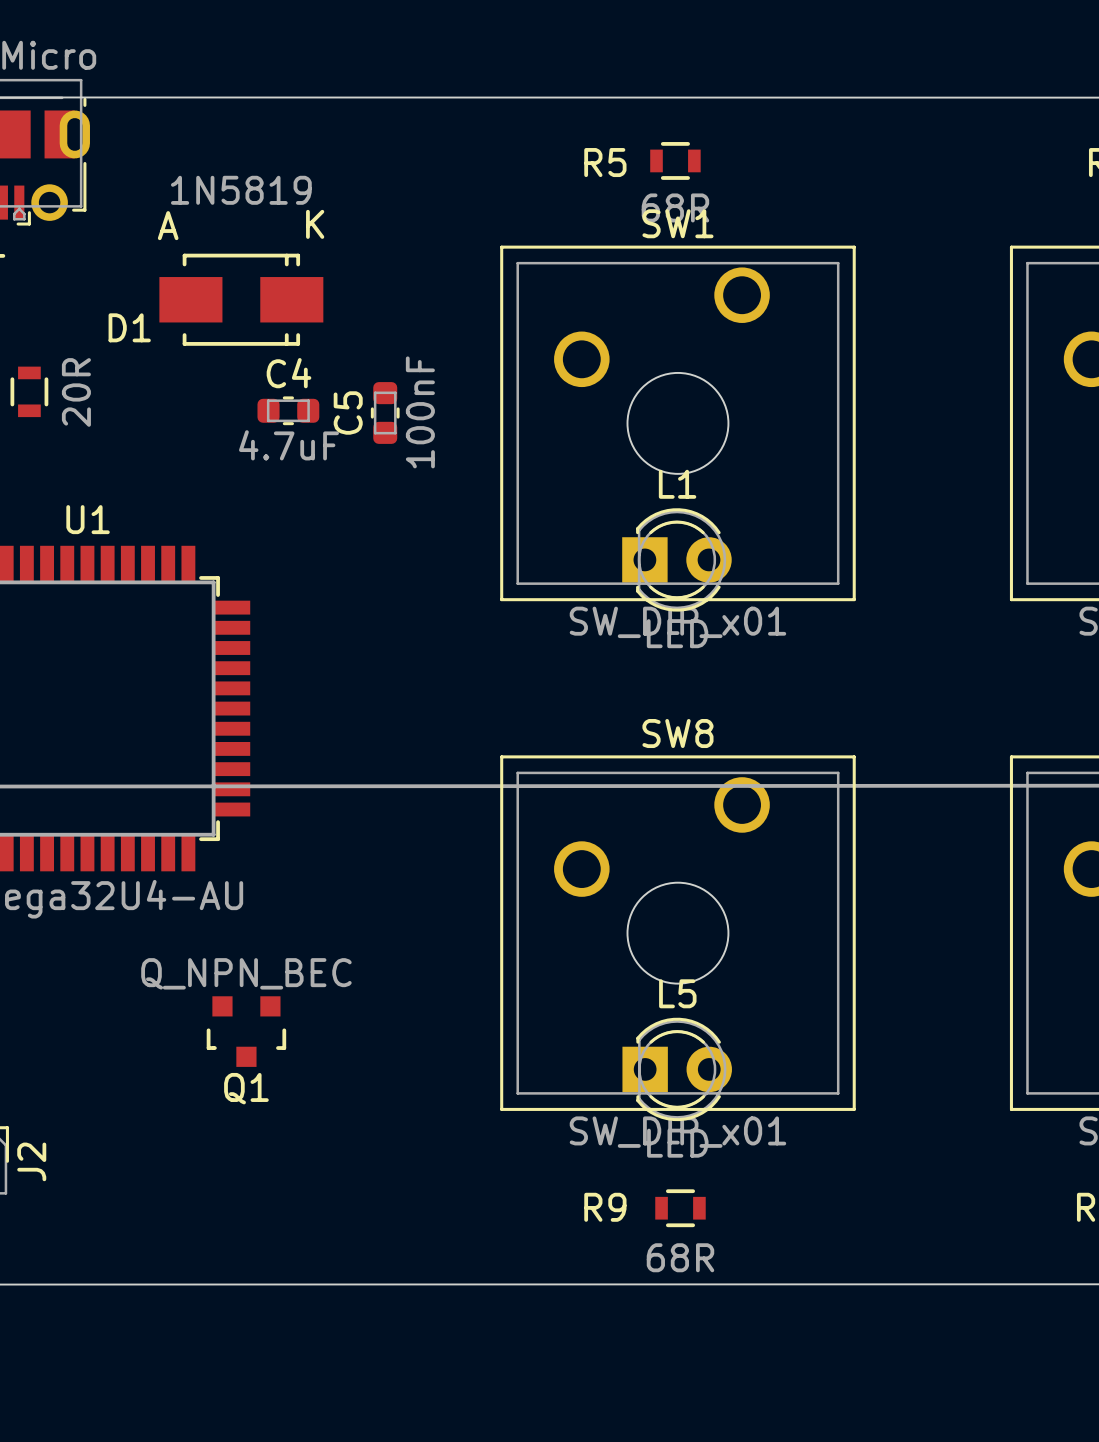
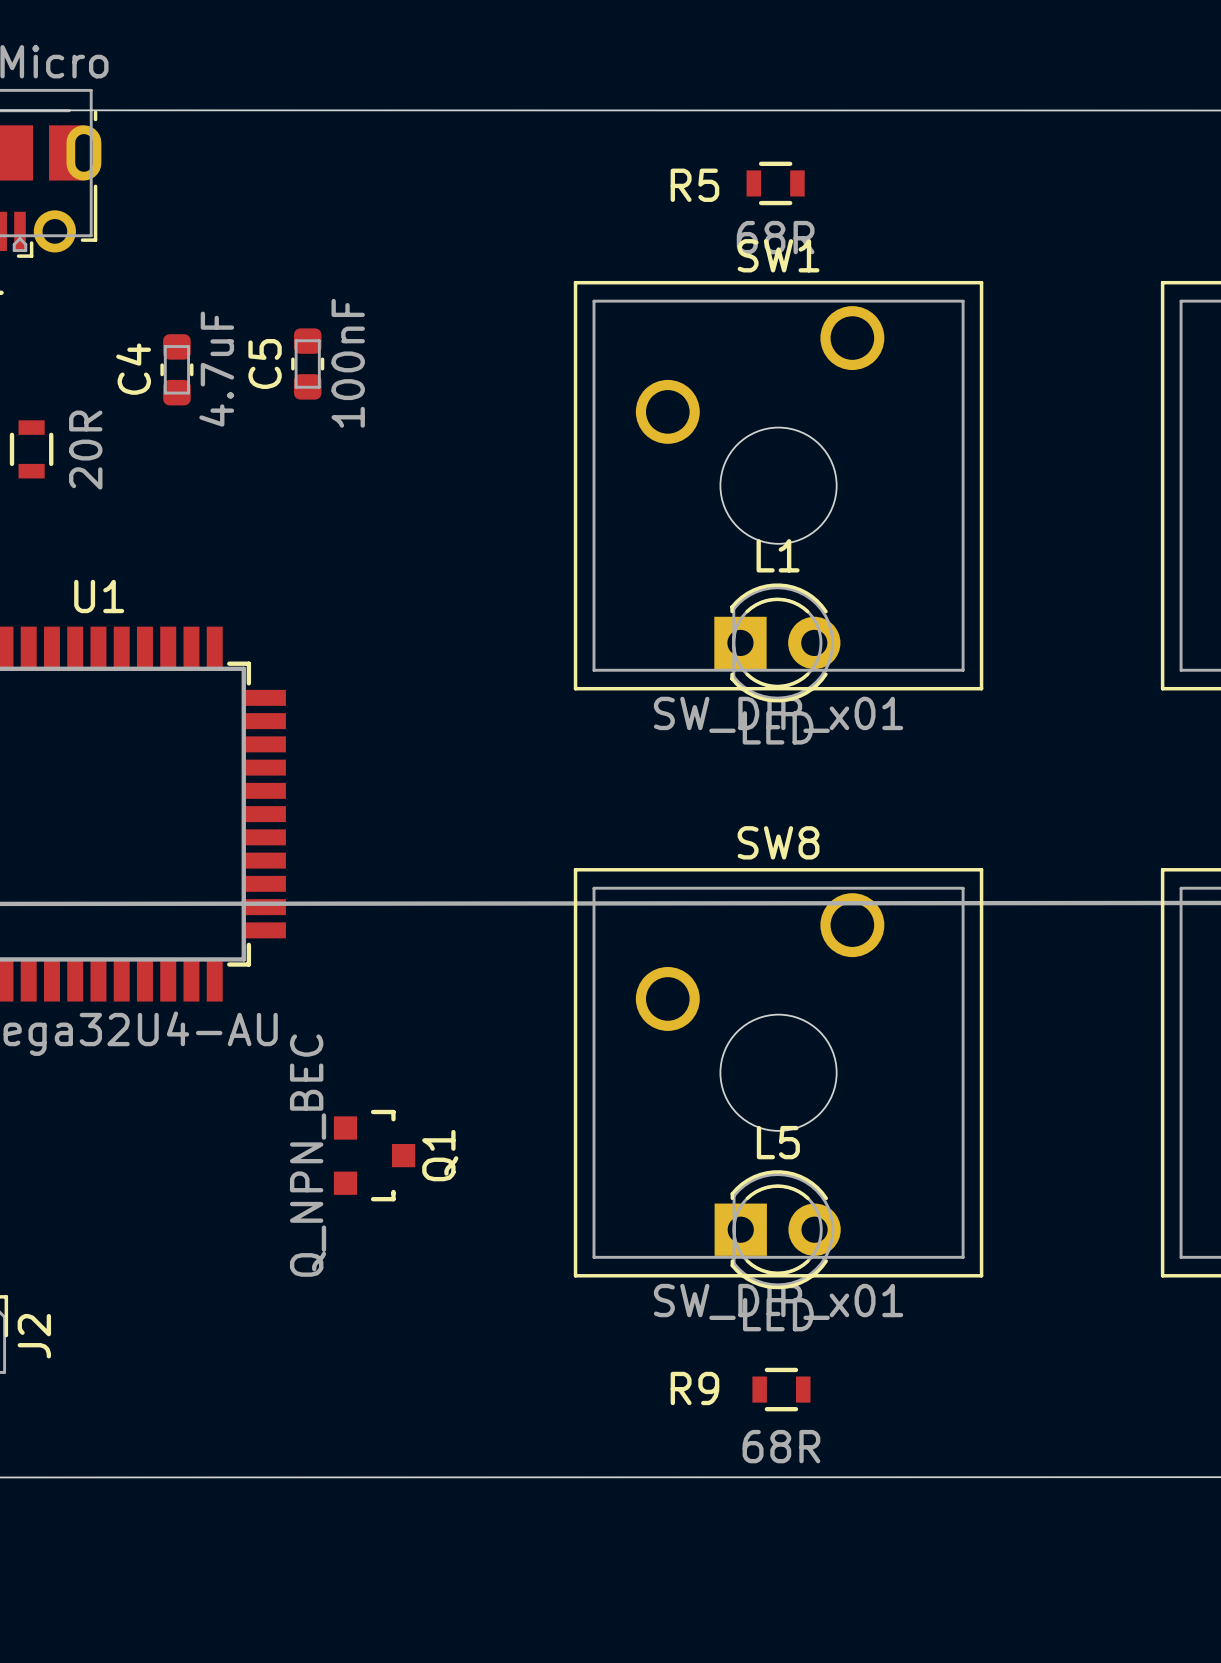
D1: 1N5819 (241, 299) -> none
C4 name position: C4 (288, 373) -> C4 (133, 369)
C4 rotation: 0° (288, 410) -> 90° clockwise (176, 369)
C4 position: (288, 410) -> (176, 369)
C5 position: (385, 412) -> (307, 363)
C4 value position: 4.7uF (288, 445) -> 4.7uF (216, 369)
Q1 rotation: 0° (246, 1031) -> 90° counterclockwise (374, 1155)
Q1 position: (246, 1031) -> (374, 1155)

